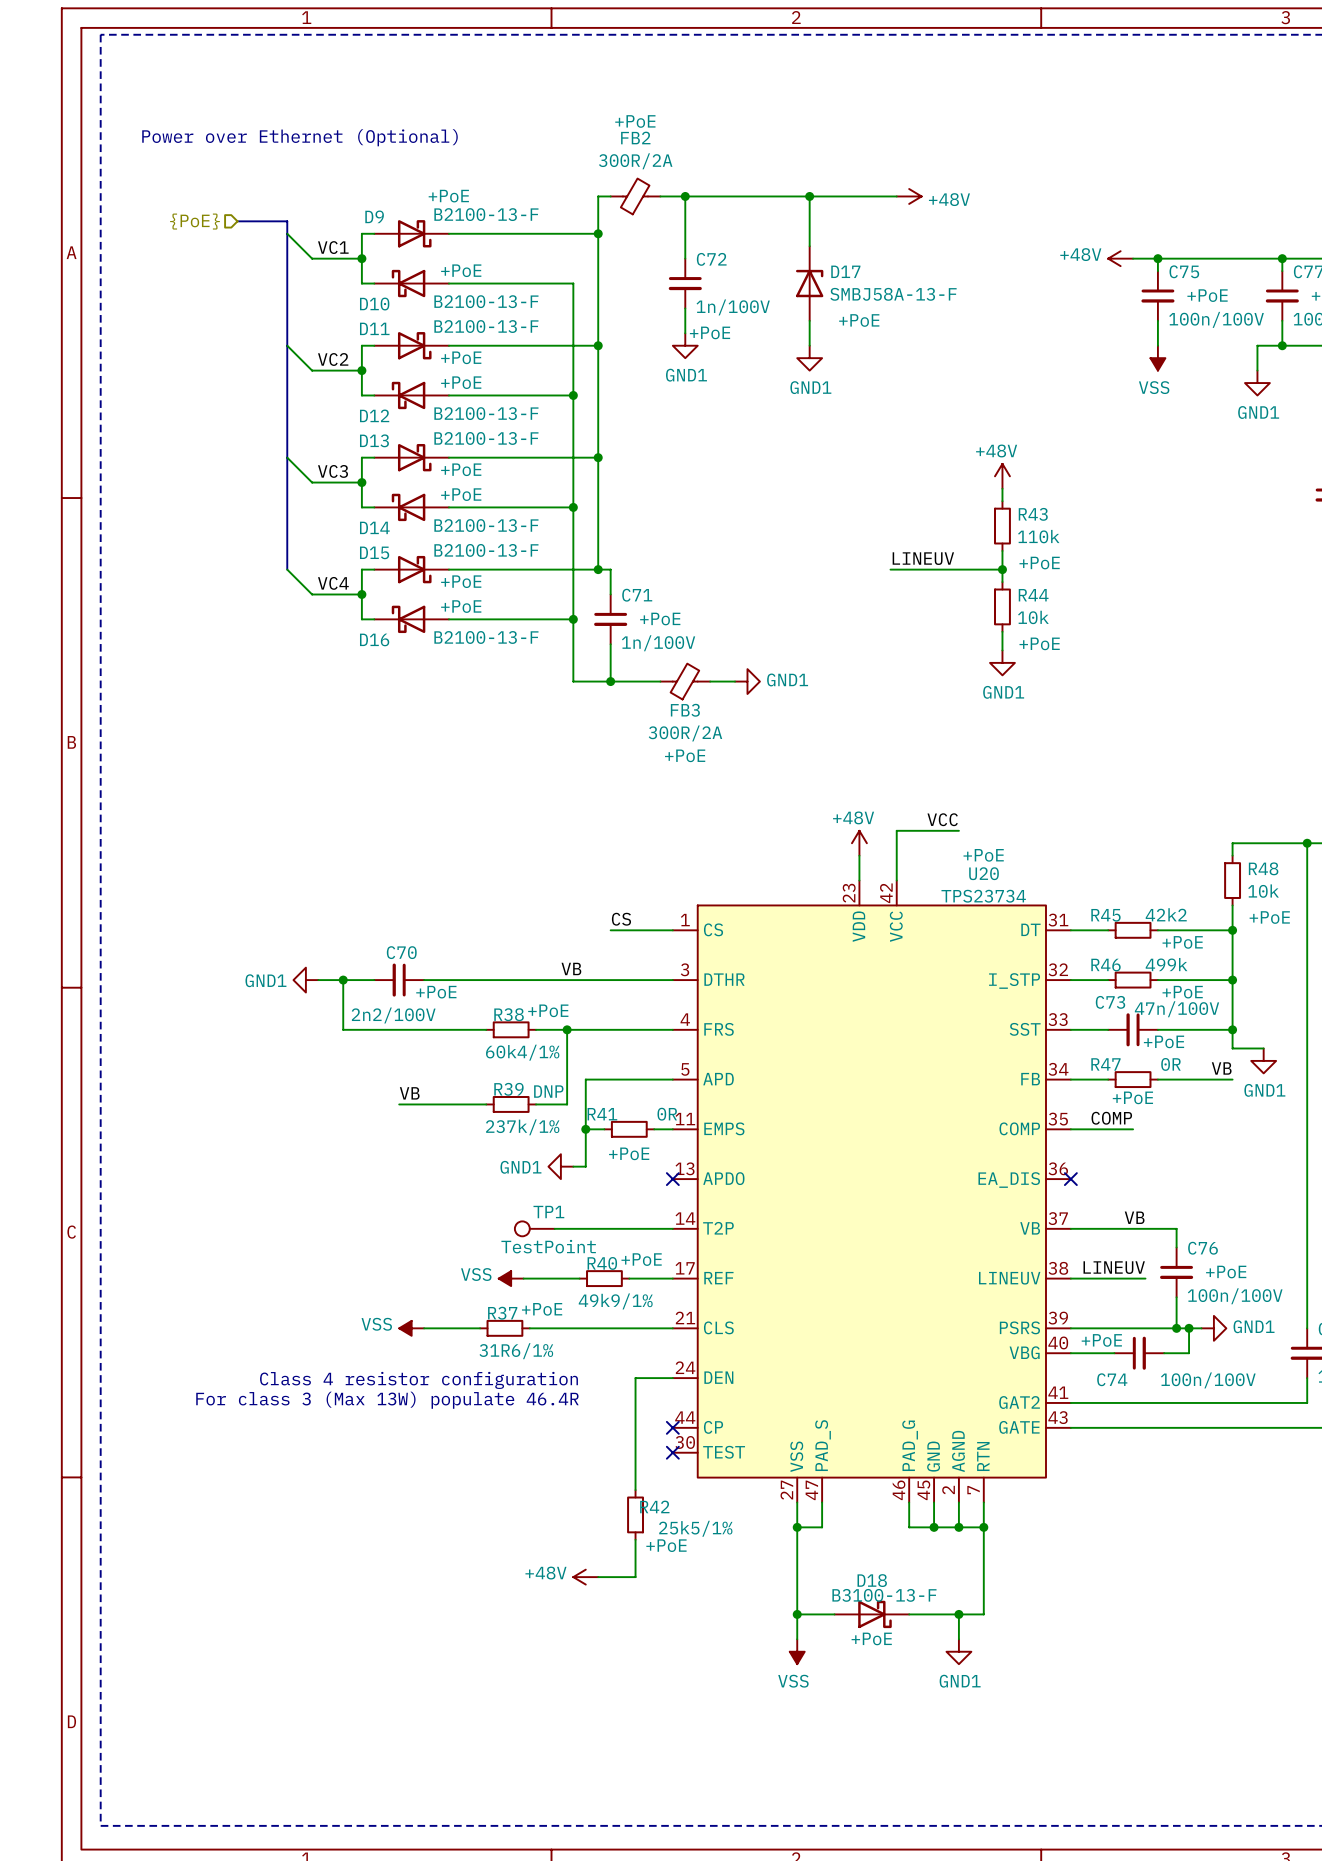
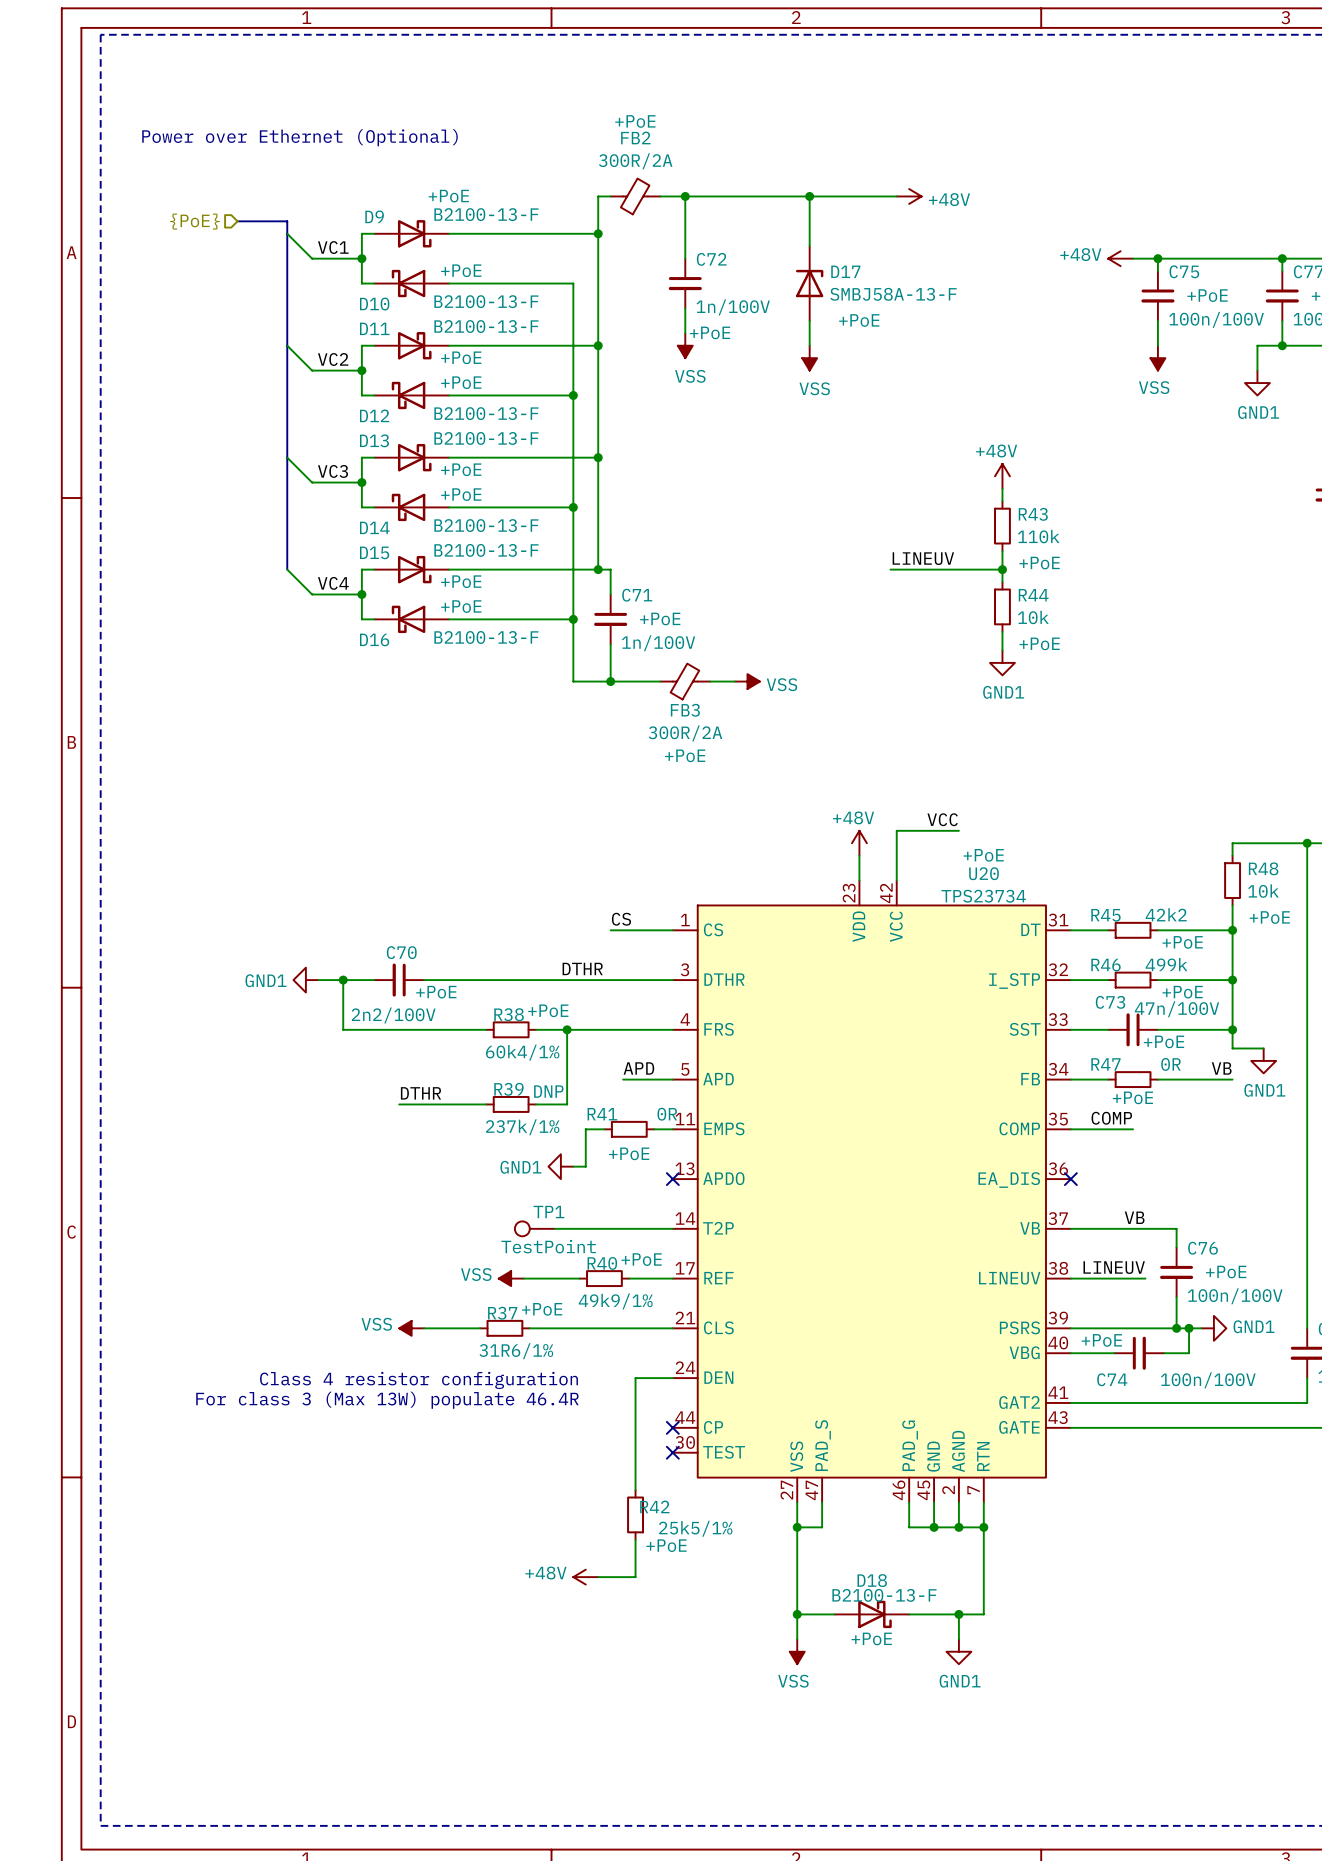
power symbol: GND1 (685, 345) -> VSS (685, 345)
power symbol: GND1 (809, 358) -> VSS (809, 358)
power symbol: GND1 (747, 681) -> VSS (747, 681)
label: VB (571, 968) -> DTHR (582, 968)
label: none -> APD (638, 1068)
wire: (623, 1079) (585, 1079) (585, 1129) -> none
label: VB (409, 1093) -> DTHR (420, 1093)
junction: (585, 1129) -> none
D18 value: B3100-13-F (884, 1595) -> B2100-13-F (884, 1595)

